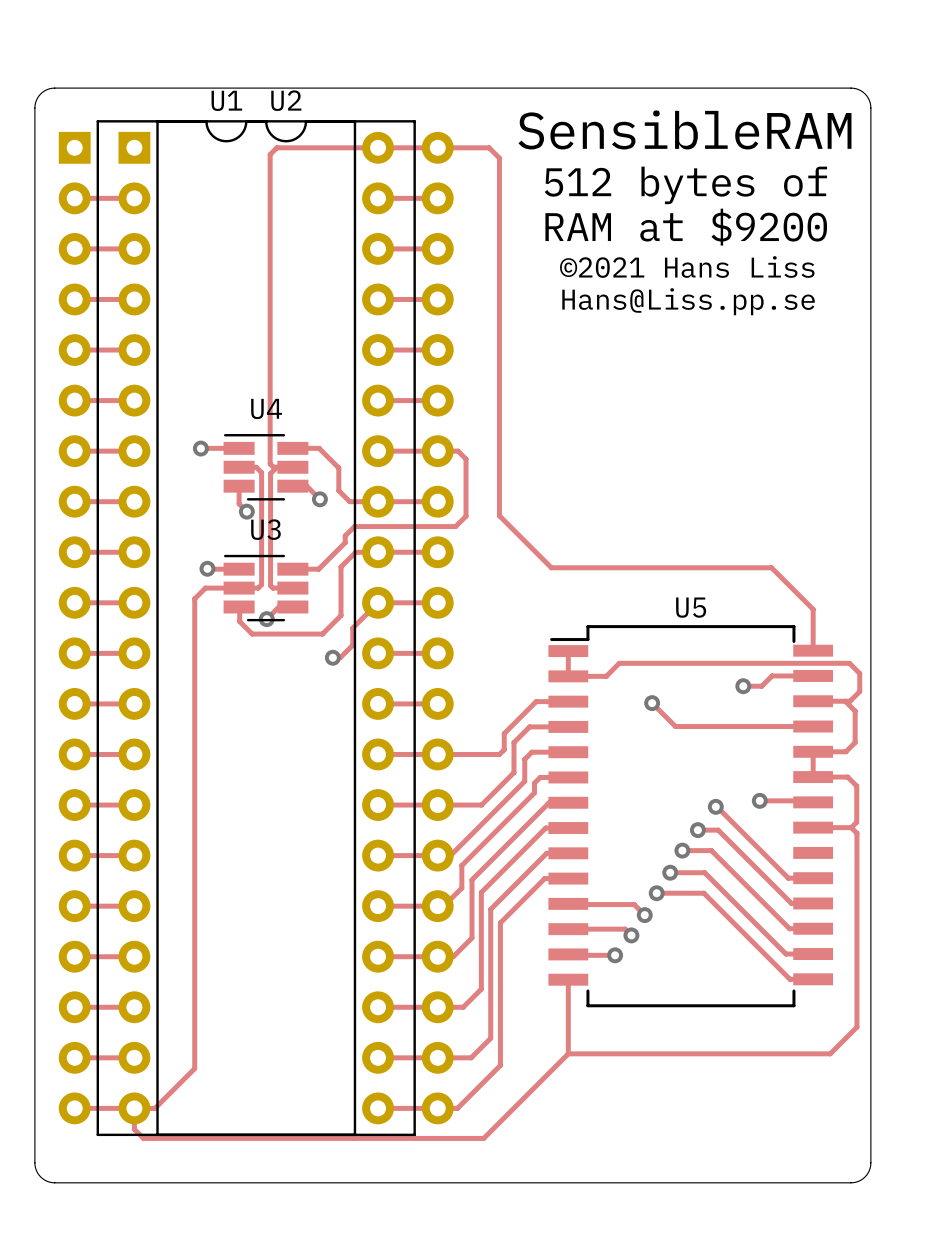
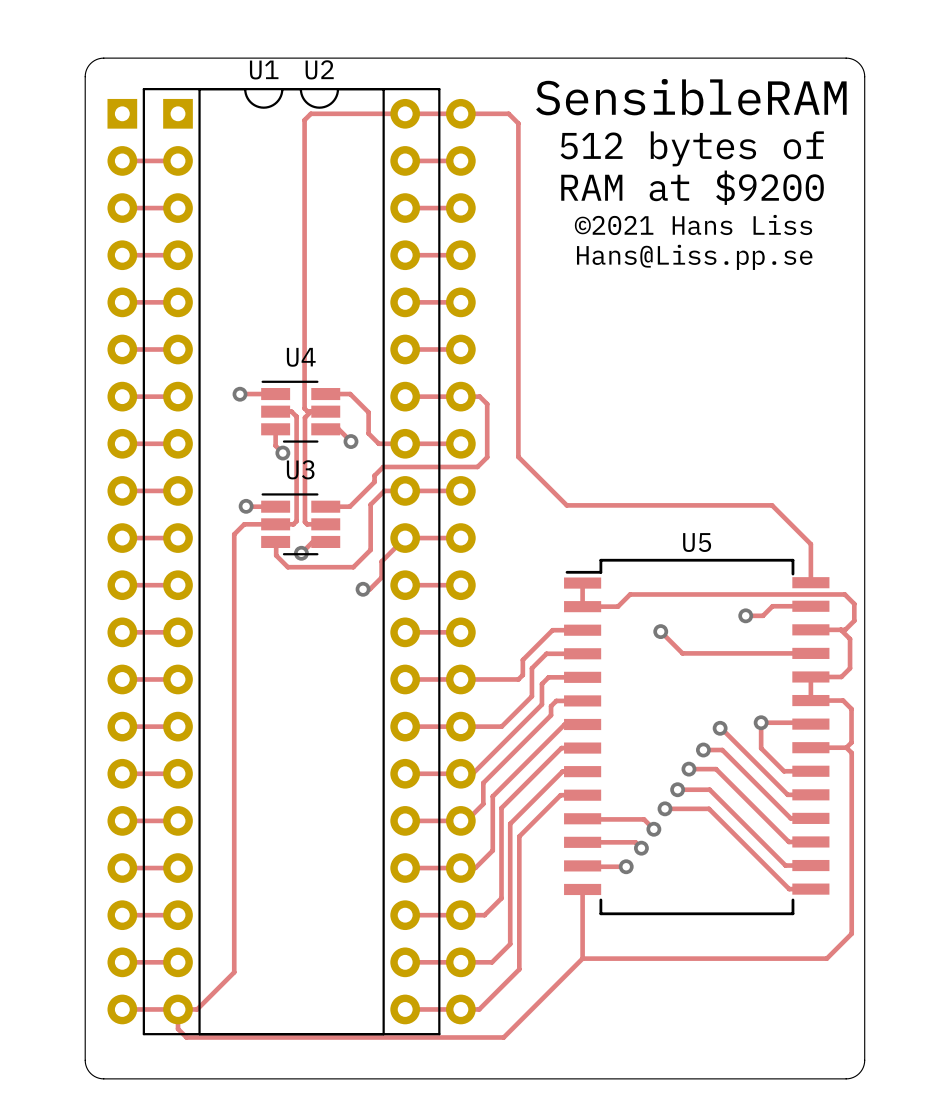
track: none -> (761, 722) (761, 748) (784, 771) (810, 771)

